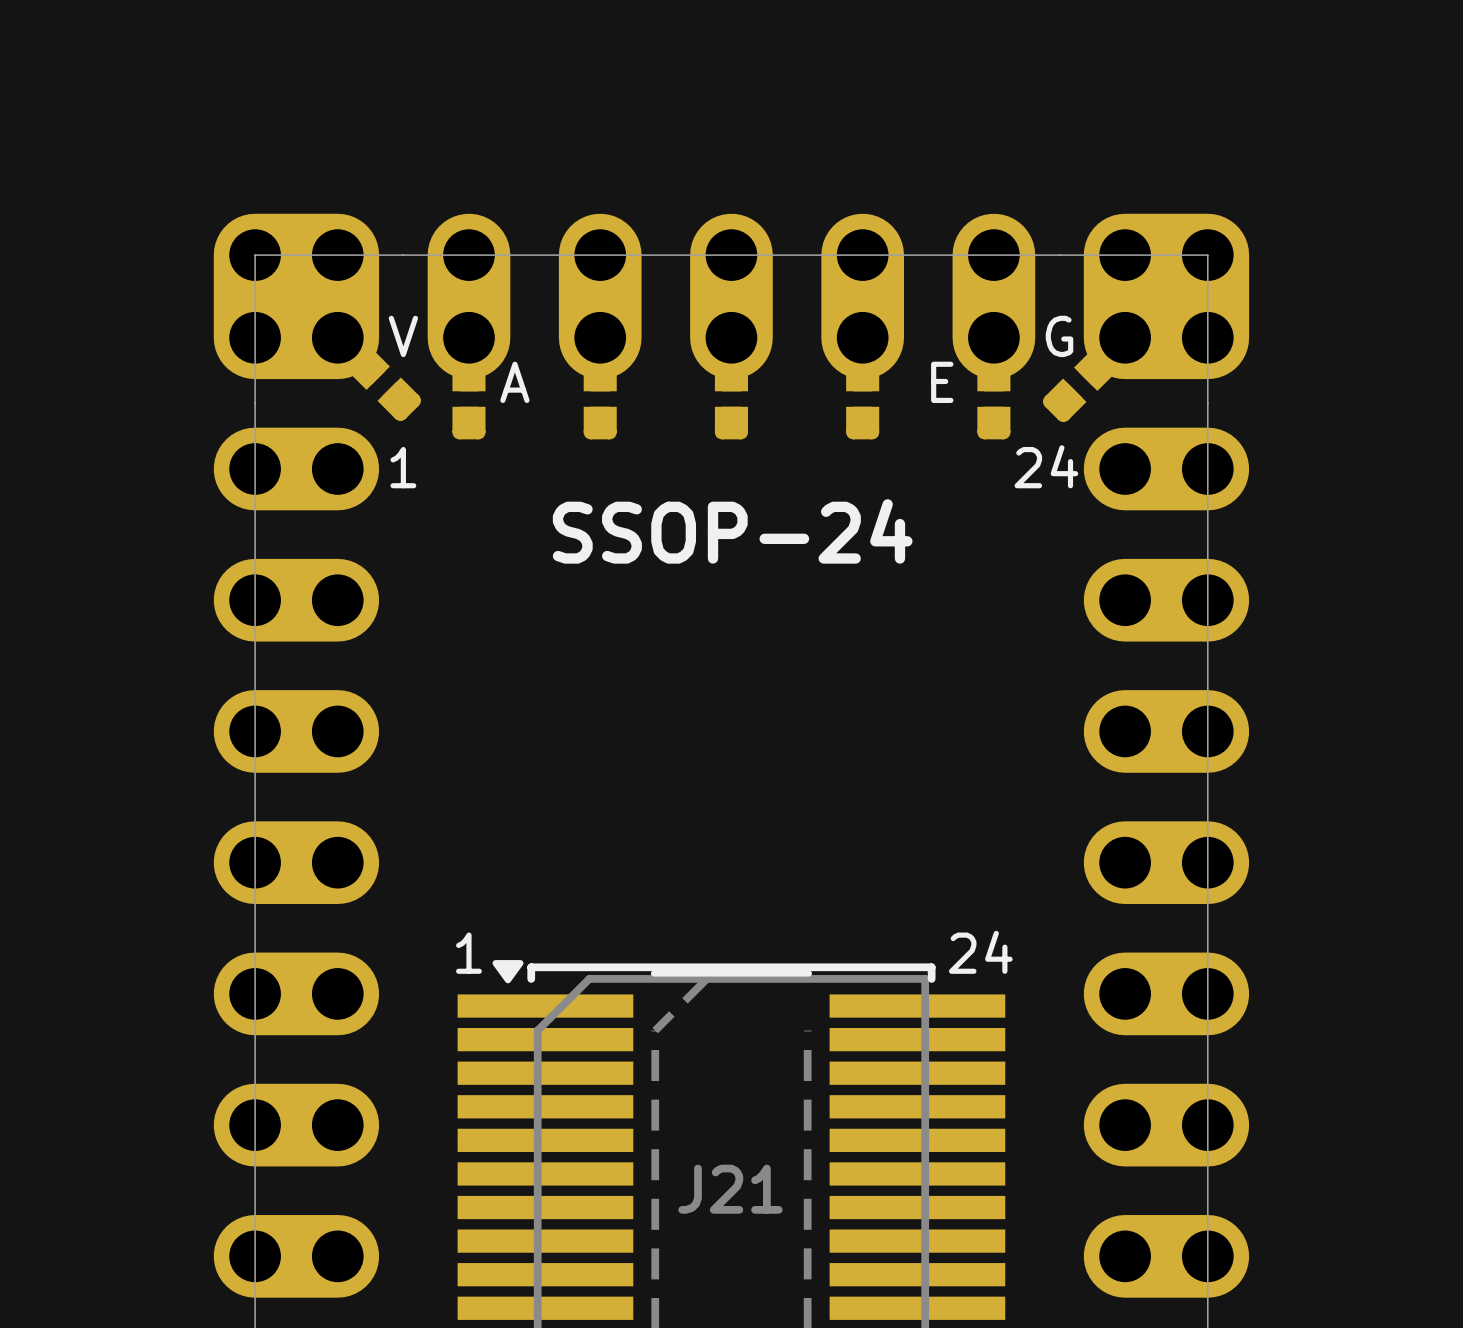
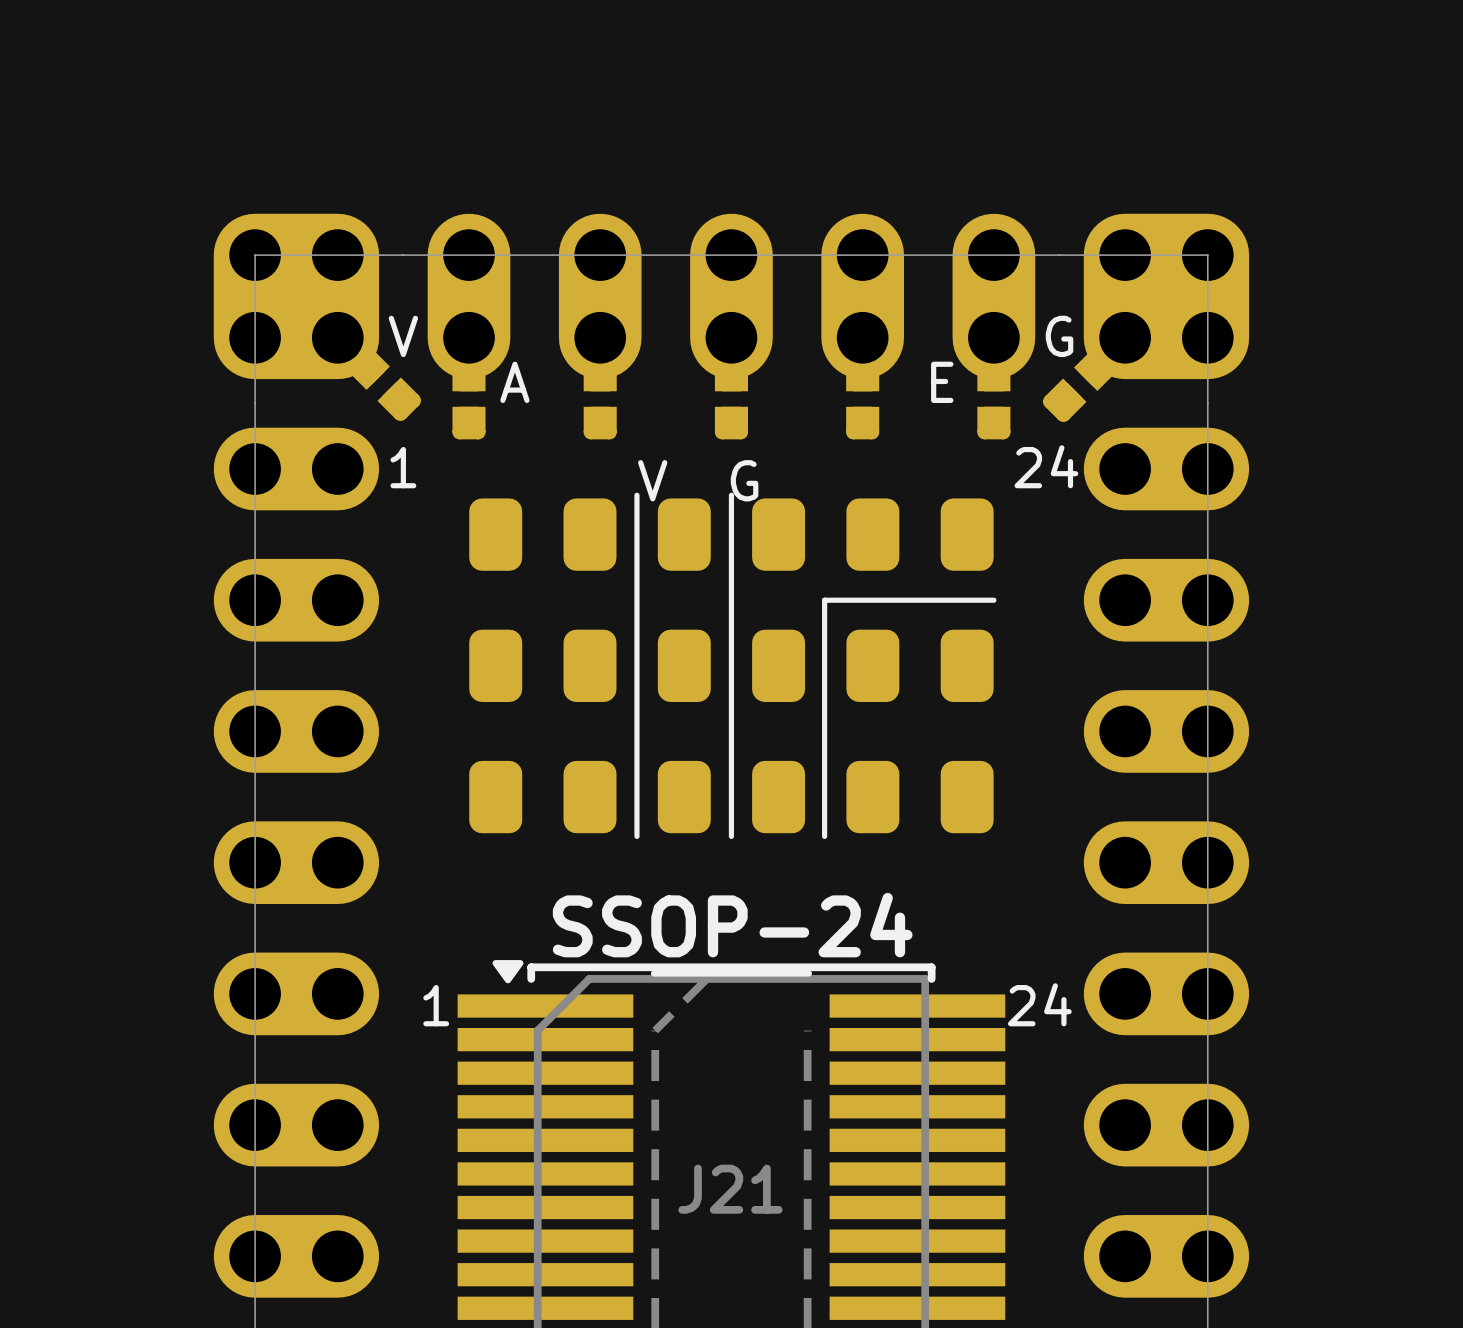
text: none -> V (652, 480)
text: none -> G (744, 480)
line: none -> (636, 495) (636, 836)
line: none -> (731, 495) (731, 836)
text position: SSOP-24 (732, 531) -> SSOP-24 (732, 925)
part: none -> (731, 534)
line: none -> (993, 600) (824, 600) (824, 836)
part: none -> (731, 665)
part: none -> (731, 797)
text position: 24 (980, 952) -> 24 (1039, 1004)
text position: 1 (468, 953) -> 1 (436, 1005)

